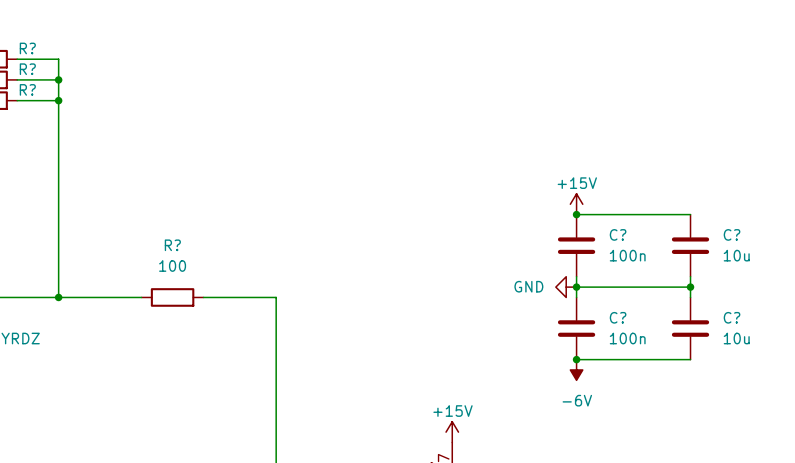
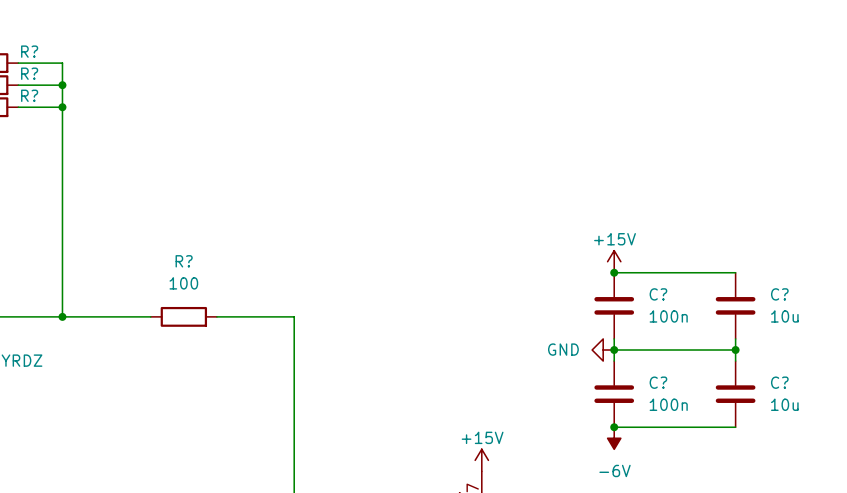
power symbol position: +15V (576, 204) -> +15V (614, 261)
wire: (576, 214) (690, 214) -> (614, 272) (735, 272)
junction: (576, 214) -> none
C?: 100n (576, 245) -> none
C?: 10u (690, 245) -> none
junction: none -> (614, 272)
power symbol position: GND (566, 287) -> GND (603, 350)
wire: (576, 287) (690, 287) -> (614, 350) (735, 350)
junction: (576, 287) -> none
C?: none -> 100n (614, 305)
junction position: (690, 287) -> (735, 350)
C?: none -> 10u (735, 305)
junction: none -> (614, 350)
C?: 100n (576, 328) -> none
C?: 10u (690, 328) -> none
wire: (576, 359) (690, 359) -> (614, 427) (735, 427)
junction: (576, 359) -> none
power symbol position: -6V (576, 369) -> -6V (614, 438)
C?: none -> 100n (614, 394)
C?: none -> 10u (735, 394)
junction: none -> (614, 427)

